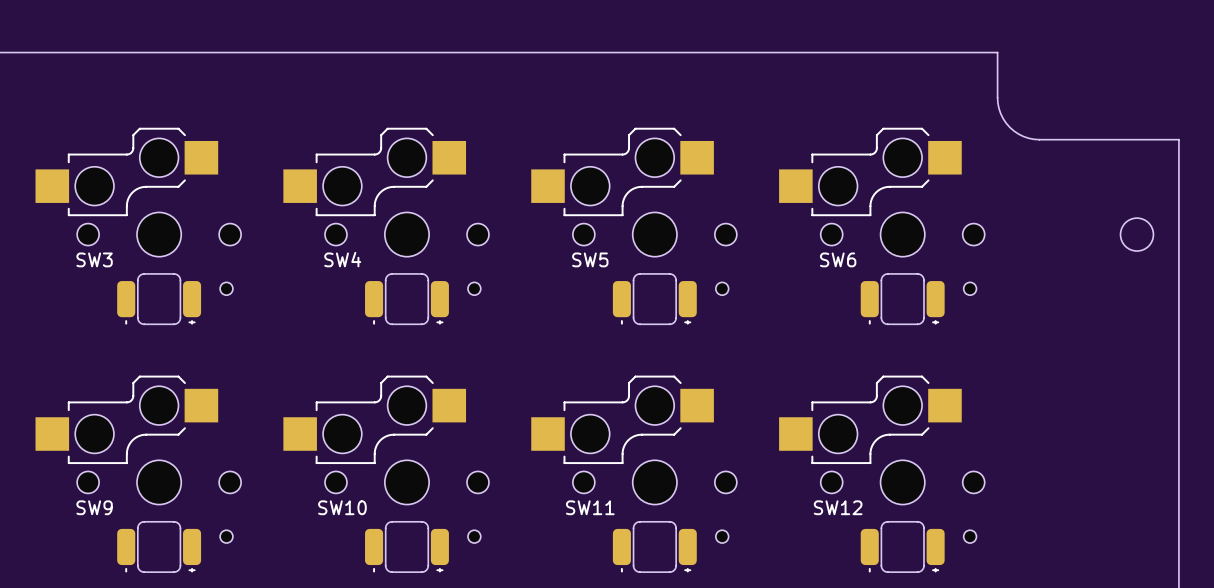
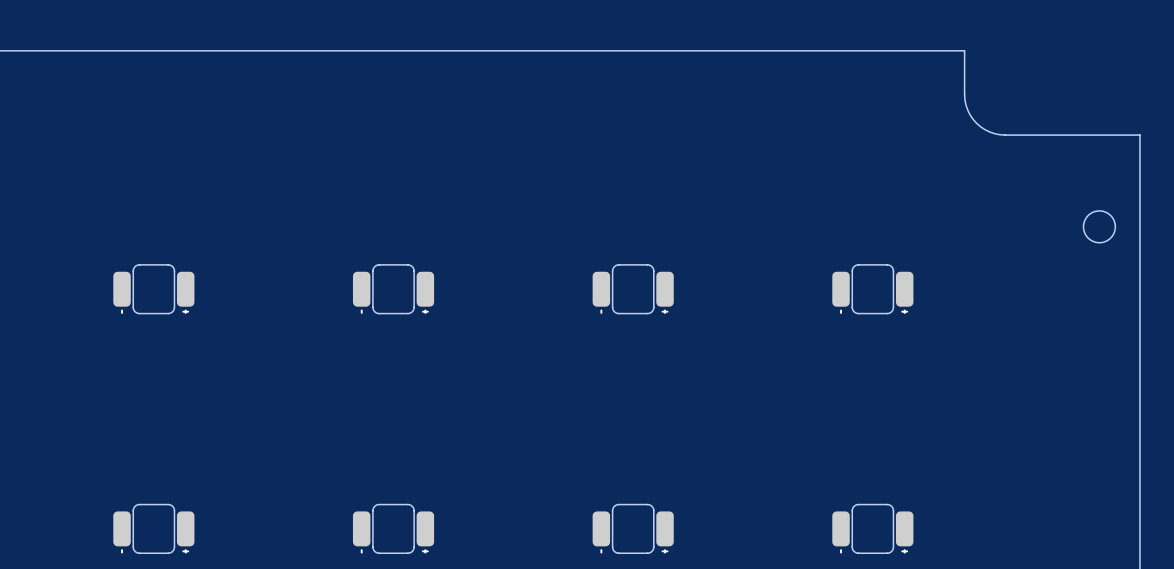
SW3: (138, 211) -> none
SW4: (386, 211) -> none
SW5: (634, 211) -> none
SW6: (881, 211) -> none
SW9: (138, 459) -> none
SW10: (386, 459) -> none
SW11: (634, 459) -> none
SW12: (881, 459) -> none

